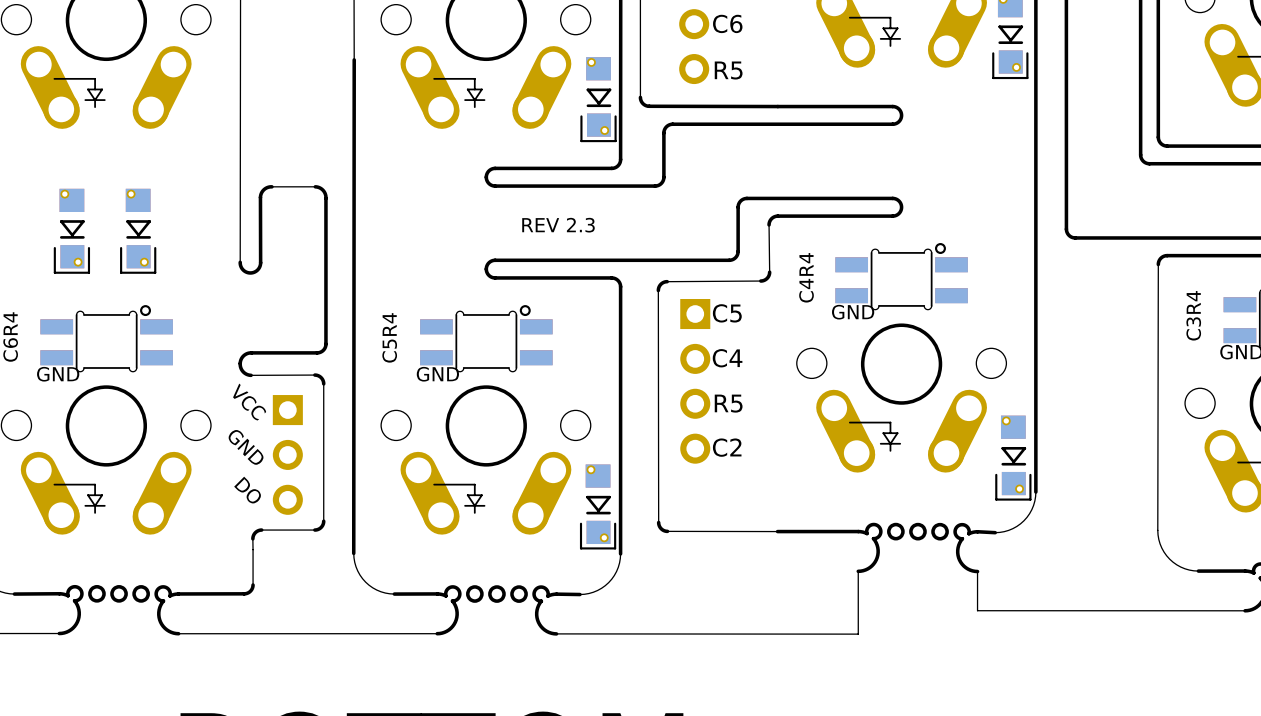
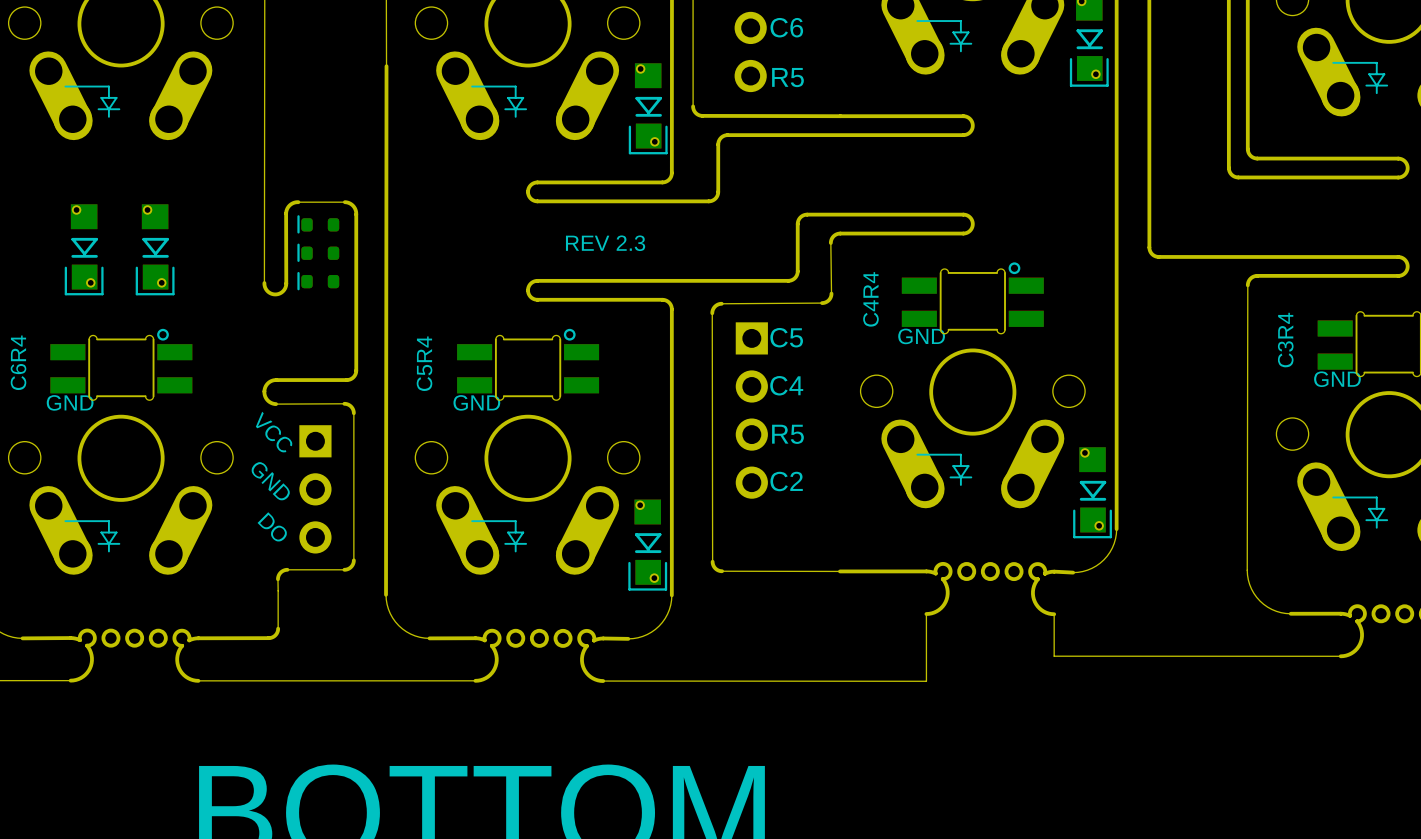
part: none -> (318, 224)
part: none -> (318, 252)
part: none -> (318, 281)

